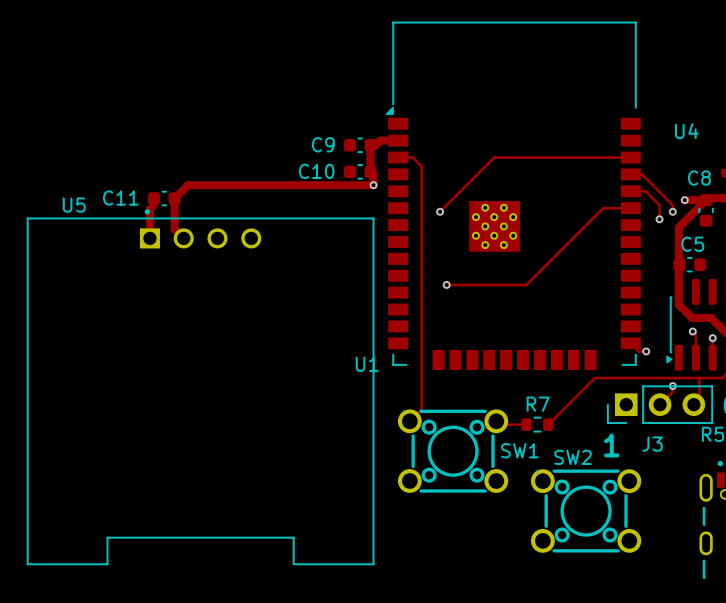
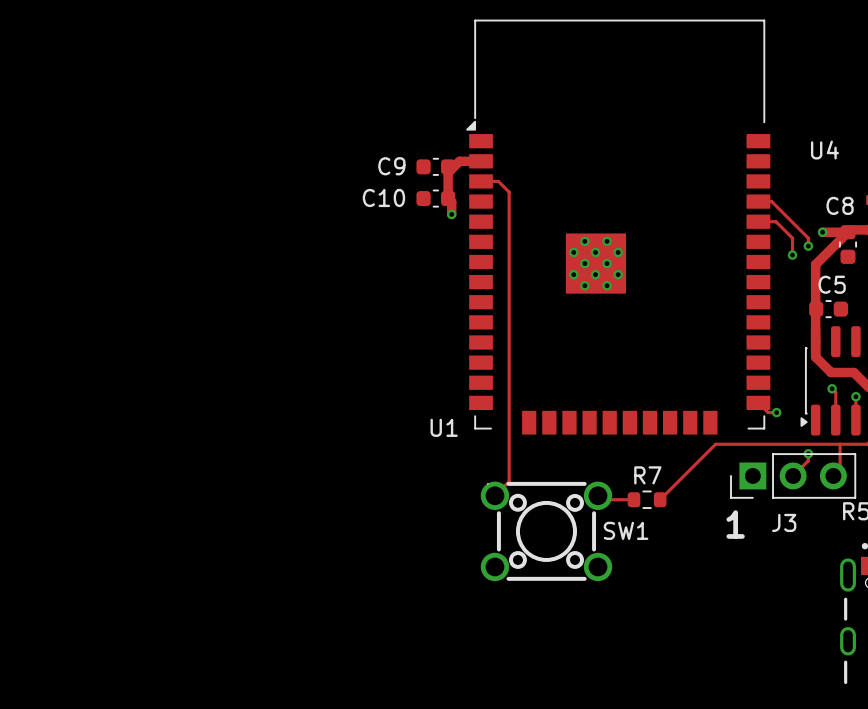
track: (630, 157) (494, 157) (440, 211) -> none
track: (373, 185) (187, 185) (174, 198) (174, 229) (183, 238) -> none
track: (154, 198) (154, 205) (149, 209) (149, 238) -> none
C11: (164, 198) -> none
track: (630, 208) (603, 208) (526, 284) (446, 284) -> none
via: (440, 211) -> none
via: (446, 284) -> none
U5: (200, 387) -> none
SW2: (586, 511) -> none

